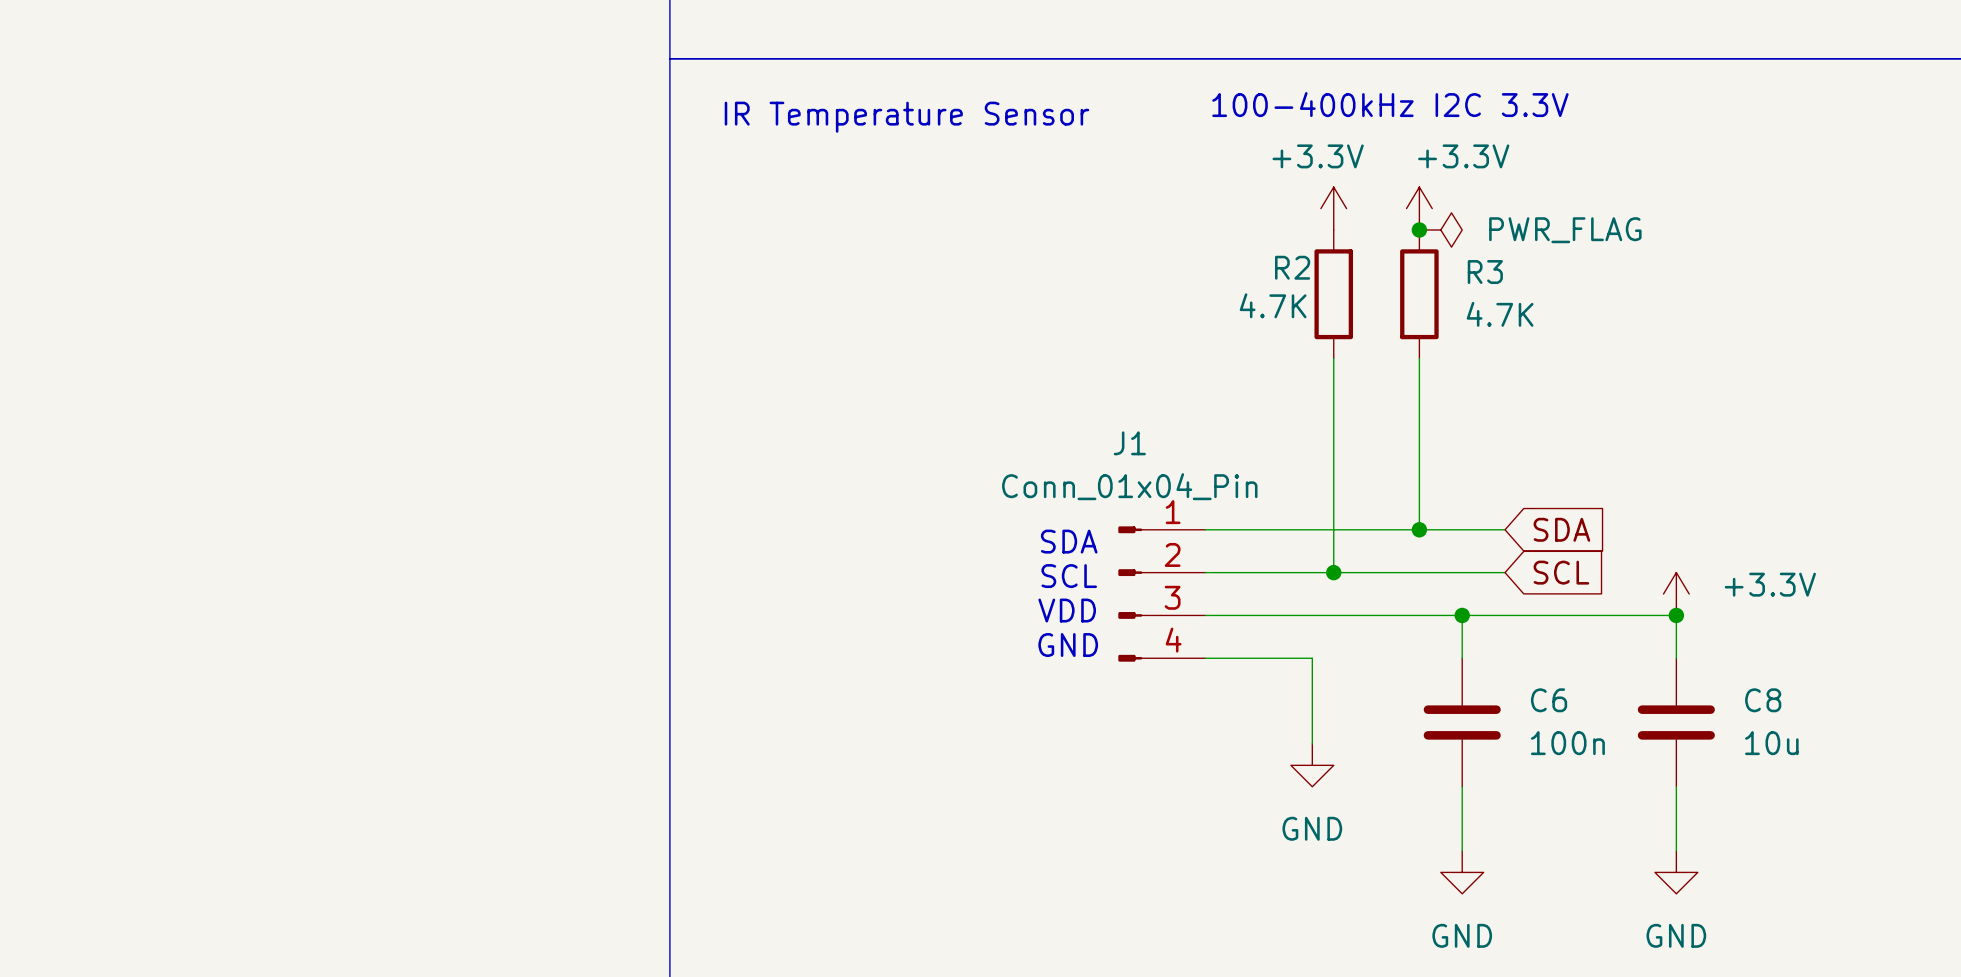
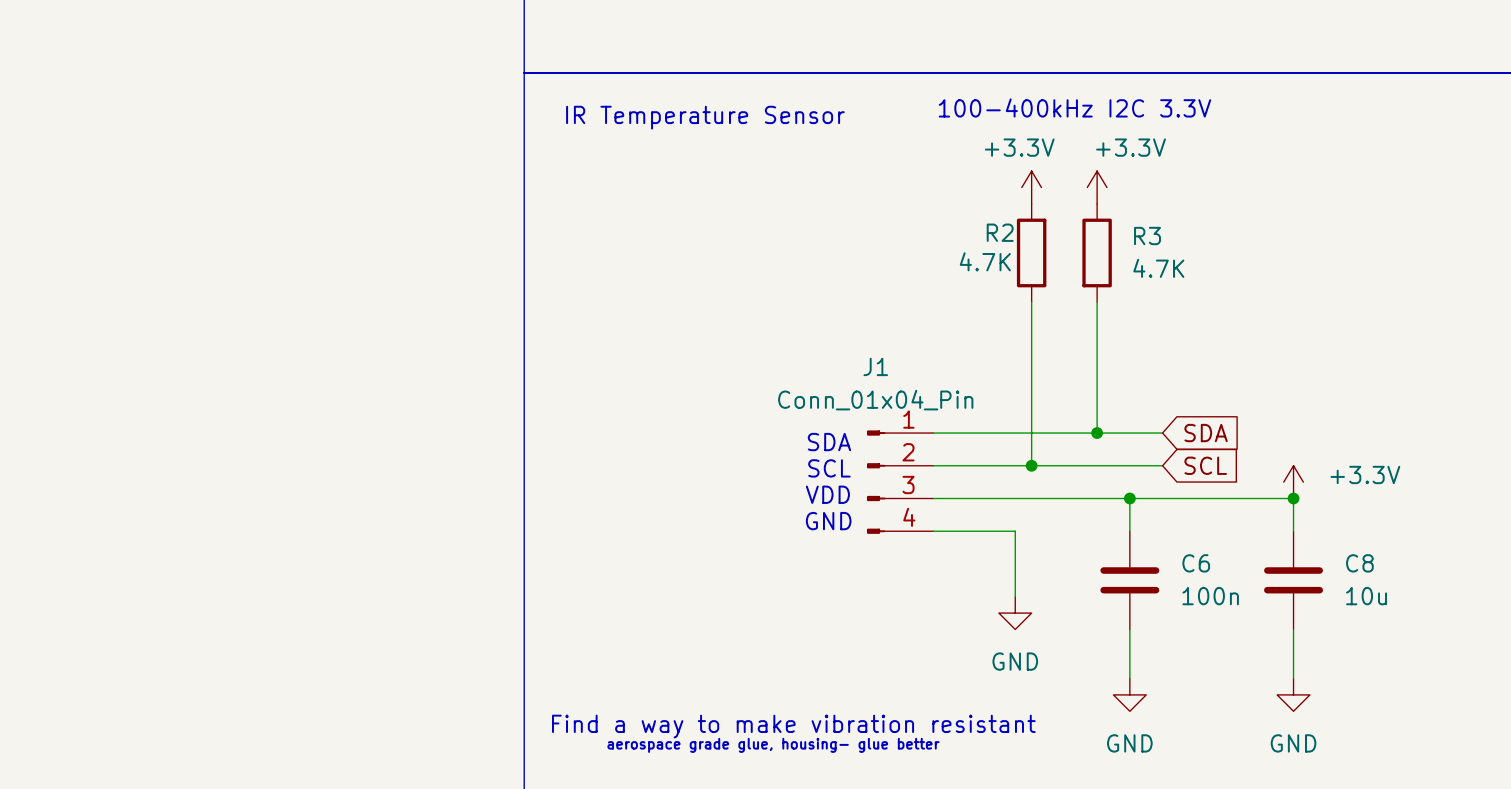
junction: (1419, 230) -> none
power symbol: PWR_FLAG (1440, 230) -> none
text: none -> Find a way to make vibration resistant (793, 726)
text: none -> aerospace grade glue, housing- glue better (773, 745)

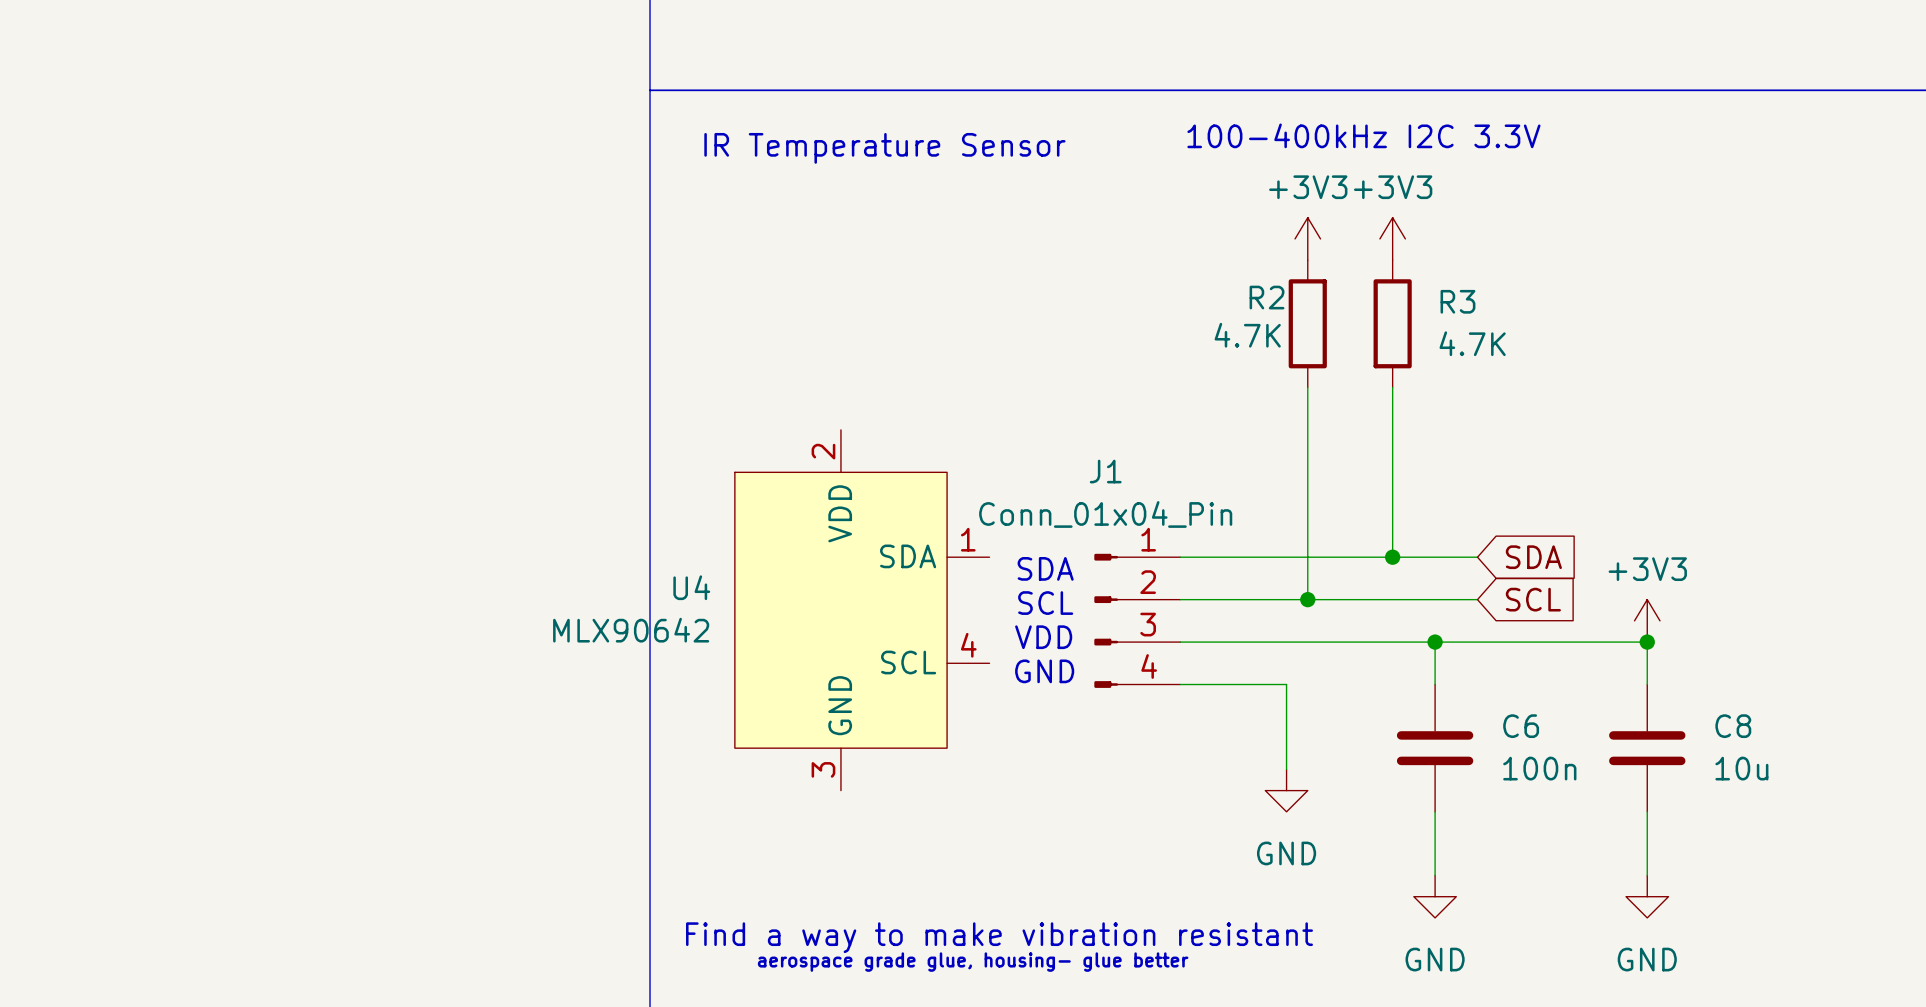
power symbol: +3.3V (1031, 187) -> +3V3 (1307, 238)
power symbol: +3.3V (1097, 187) -> +3V3 (1392, 238)
U4: none -> MLX90642 (862, 610)
power symbol: +3.3V (1293, 482) -> +3V3 (1647, 620)

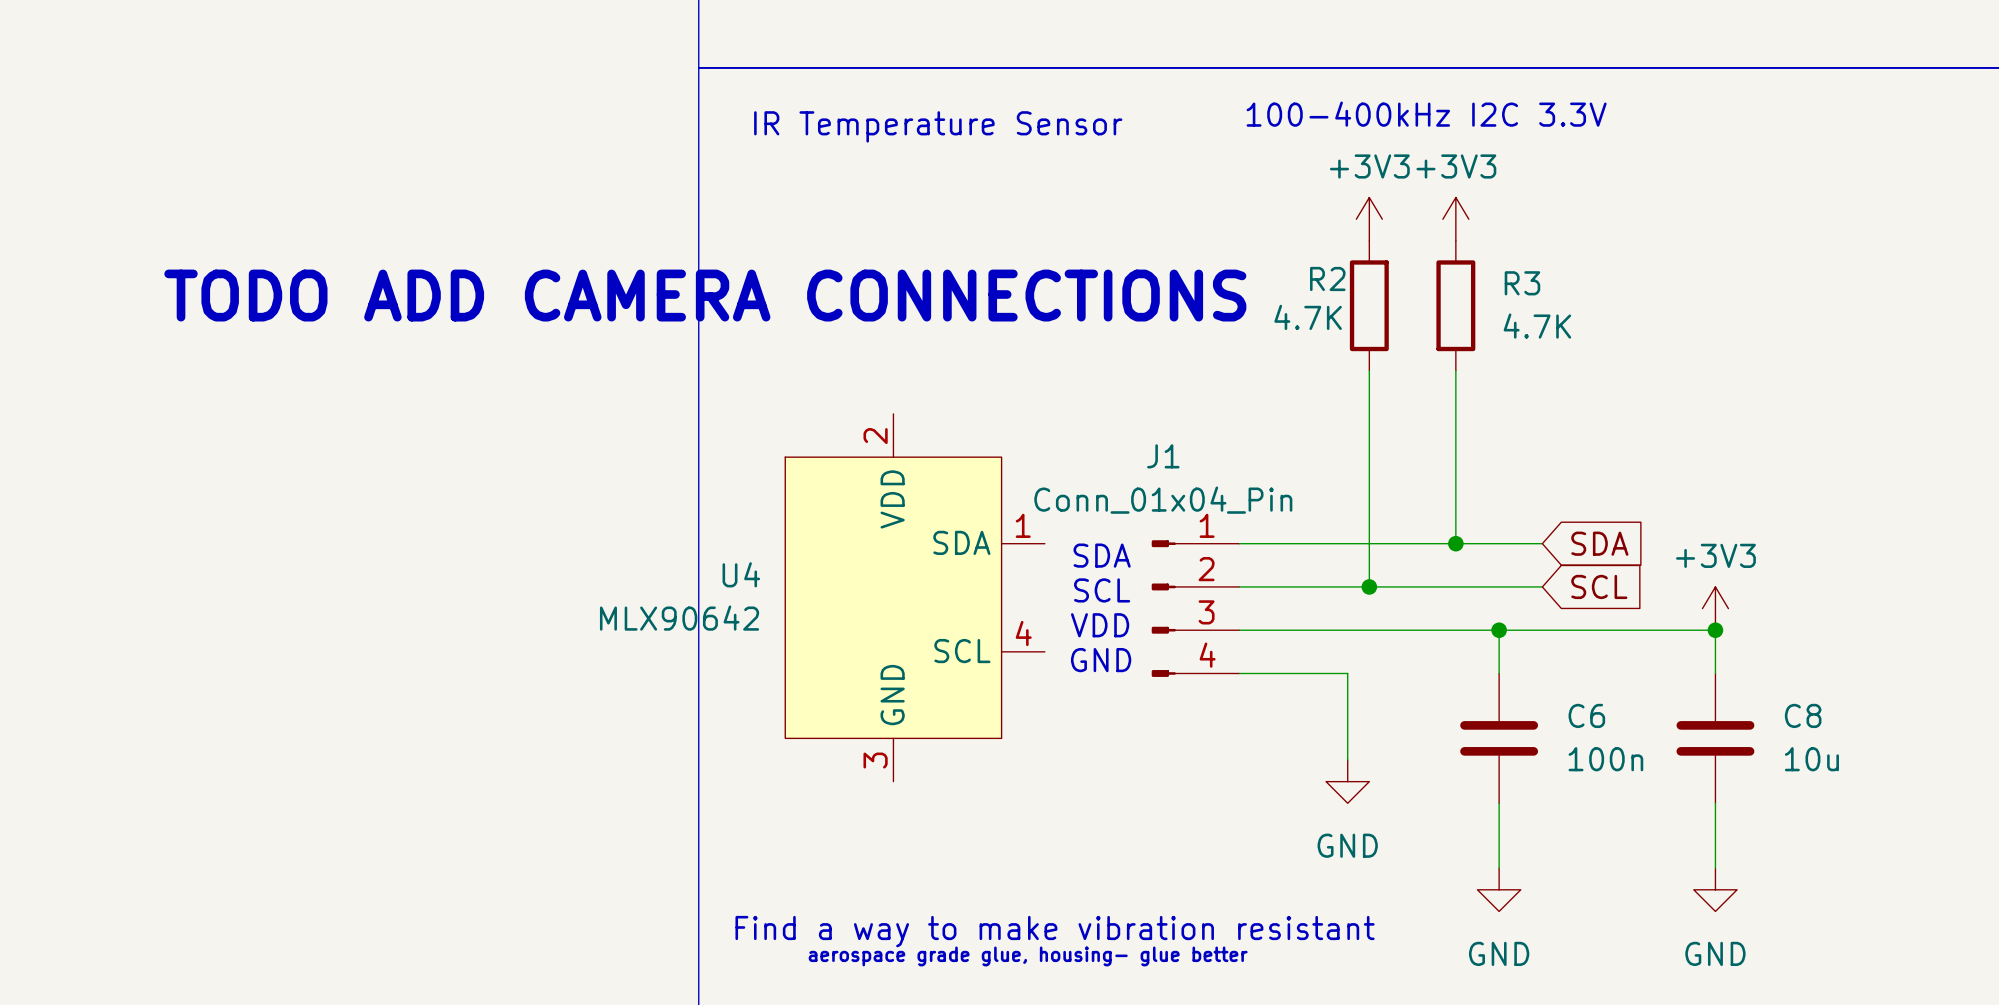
text: none -> TODO ADD CAMERA CONNECTIONS (705, 295)

